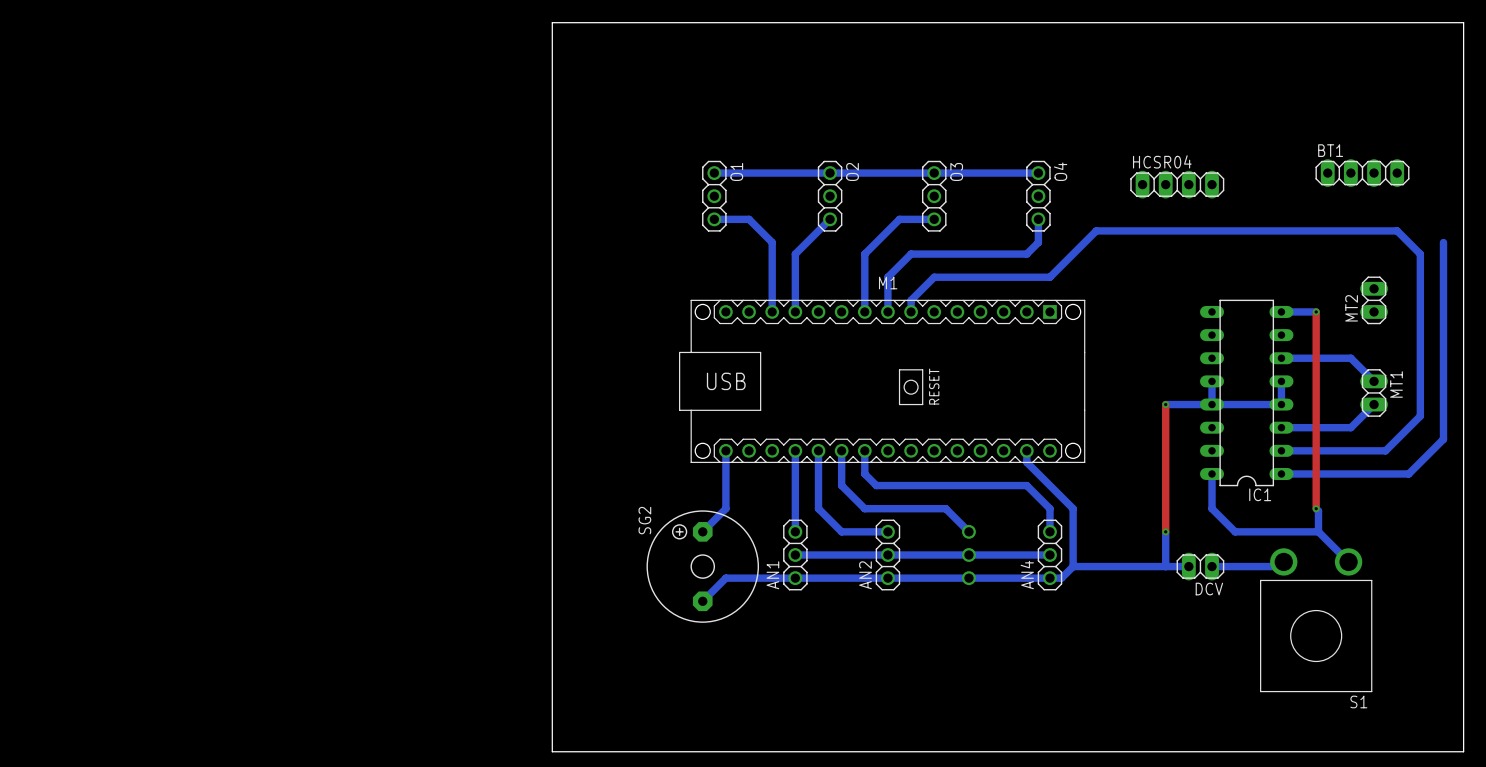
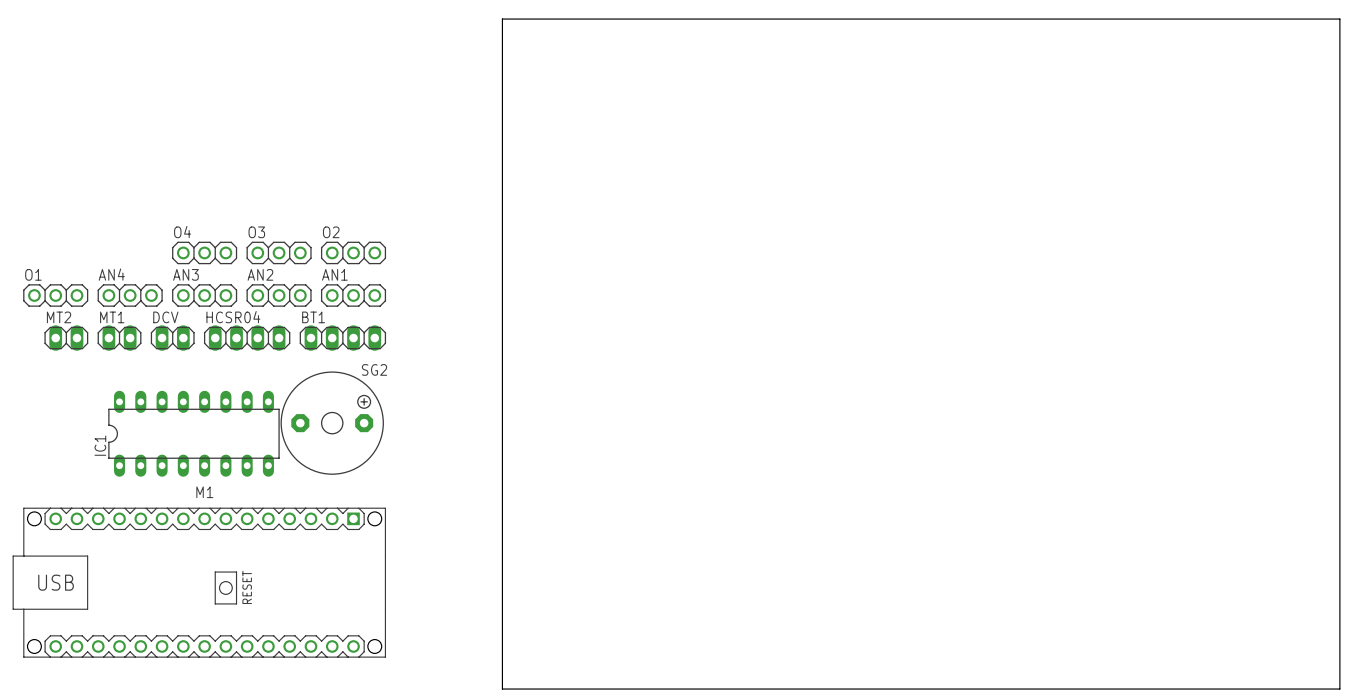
O1 name position: O1 (736, 171) -> O1 (33, 274)
O2 name position: O2 (852, 171) -> O2 (331, 232)
O3 name position: O3 (956, 171) -> O3 (256, 232)
O4 name position: O4 (1060, 171) -> O4 (182, 232)
bottom track: (714, 173) (1038, 173) -> none
BT1 position: (1362, 173) -> (342, 338)
HCSR04 position: (1177, 184) -> (247, 338)
O1 rotation: 0° (714, 196) -> 90° clockwise (55, 295)
O1 position: (714, 196) -> (55, 295)
O2 rotation: 0° (830, 196) -> 90° clockwise (353, 252)
O2 position: (830, 196) -> (353, 252)
O3 rotation: 0° (934, 196) -> 90° clockwise (279, 252)
O3 position: (934, 196) -> (279, 252)
O4 rotation: 0° (1038, 196) -> 90° clockwise (204, 252)
O4 position: (1038, 196) -> (204, 252)
bottom track: (714, 219) (749, 219) (772, 242) (772, 311) -> none
bottom track: (830, 219) (795, 254) (795, 311) -> none
bottom track: (934, 219) (899, 219) (864, 254) (864, 311) -> none
bottom track: (1038, 219) (1038, 242) (1026, 254) (911, 254) (887, 277) (887, 311) -> none
bottom track: (1443, 242) (1443, 439) (1408, 473) (1281, 473) -> none
MT2 rotation: 0° (1374, 300) -> 90° clockwise (66, 338)
MT2 position: (1374, 300) -> (66, 338)
bottom track: (911, 311) (911, 300) (934, 277) (1049, 277) (1096, 230) (1397, 230) (1420, 254) (1420, 416) (1385, 450) (1281, 450) -> none
bottom track: (1281, 311) (1316, 311) -> none
top track: (1316, 311) (1316, 508) -> none
via: (1316, 311) -> none
AN3: none -> (204, 295)
bottom track: (1281, 358) (1350, 358) (1374, 381) -> none
DCV: none -> (172, 338)
M1 position: (882, 381) -> (199, 582)
bottom track: (1212, 381) (1212, 404) -> none
bottom track: (1281, 381) (1281, 404) (1165, 404) -> none
MT1 name position: MT1 (1396, 384) -> MT1 (112, 317)
IC1 rotation: 0° (1246, 392) -> 90° clockwise (193, 433)
IC1 position: (1246, 392) -> (193, 433)
MT1 rotation: 0° (1374, 392) -> 90° clockwise (119, 338)
MT1 position: (1374, 392) -> (119, 338)
top track: (1165, 404) (1165, 531) -> none
via: (1165, 404) -> none
bottom track: (1374, 404) (1350, 427) (1281, 427) -> none
bottom track: (725, 450) (725, 508) (702, 531) -> none
bottom track: (795, 450) (795, 531) -> none
bottom track: (818, 450) (818, 508) (841, 531) (887, 531) -> none
bottom track: (841, 450) (841, 485) (864, 508) (945, 508) (968, 531) -> none
bottom track: (864, 450) (864, 473) (876, 485) (1026, 485) (1049, 508) (1049, 531) -> none
bottom track: (1026, 450) (1026, 462) (1073, 508) (1073, 566) -> none
bottom track: (1212, 473) (1212, 508) (1235, 531) (1318, 531) -> none
bottom track: (1316, 508) (1318, 511) (1318, 531) -> none
via: (1316, 508) -> none
bottom track: (1165, 531) (1165, 566) -> none
via: (1165, 531) -> none
bottom track: (1318, 531) (1348, 561) -> none
bottom track: (795, 555) (1049, 555) -> none
AN1 rotation: 0° (795, 555) -> 90° clockwise (353, 295)
AN1 position: (795, 555) -> (353, 295)
AN2 rotation: 0° (887, 555) -> 90° clockwise (279, 295)
AN2 position: (887, 555) -> (279, 295)
part: (968, 555) -> none
AN4 rotation: 0° (1049, 555) -> 90° clockwise (130, 295)
AN4 position: (1049, 555) -> (130, 295)
bottom track: (1283, 561) (1279, 566) (1212, 566) -> none
SG2 rotation: 0° (702, 566) -> 90° clockwise (332, 423)
SG2 position: (702, 566) -> (332, 423)
bottom track: (1073, 566) (1061, 578) (725, 578) (702, 601) -> none
bottom track: (1073, 566) (1188, 566) -> none
DCV: (1200, 566) -> none
S1: (1316, 620) -> none

